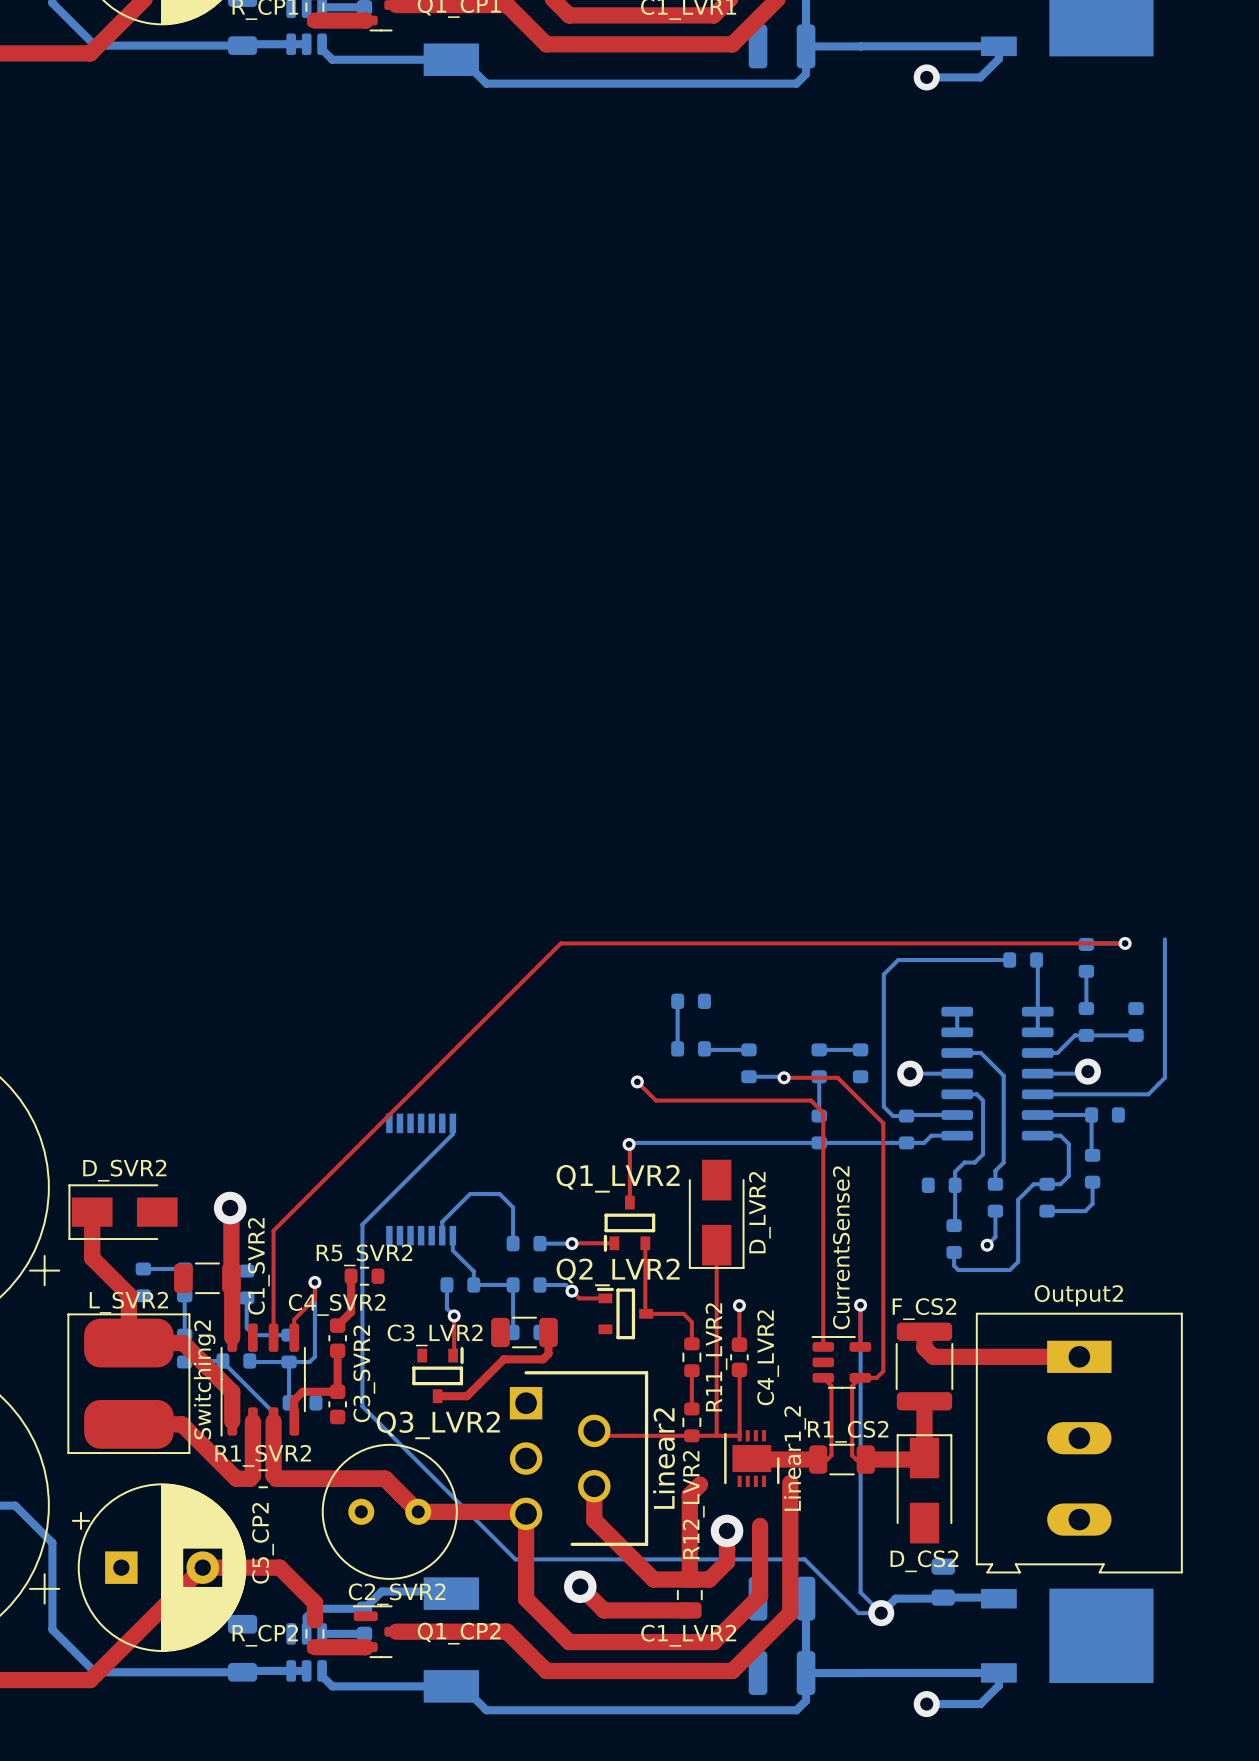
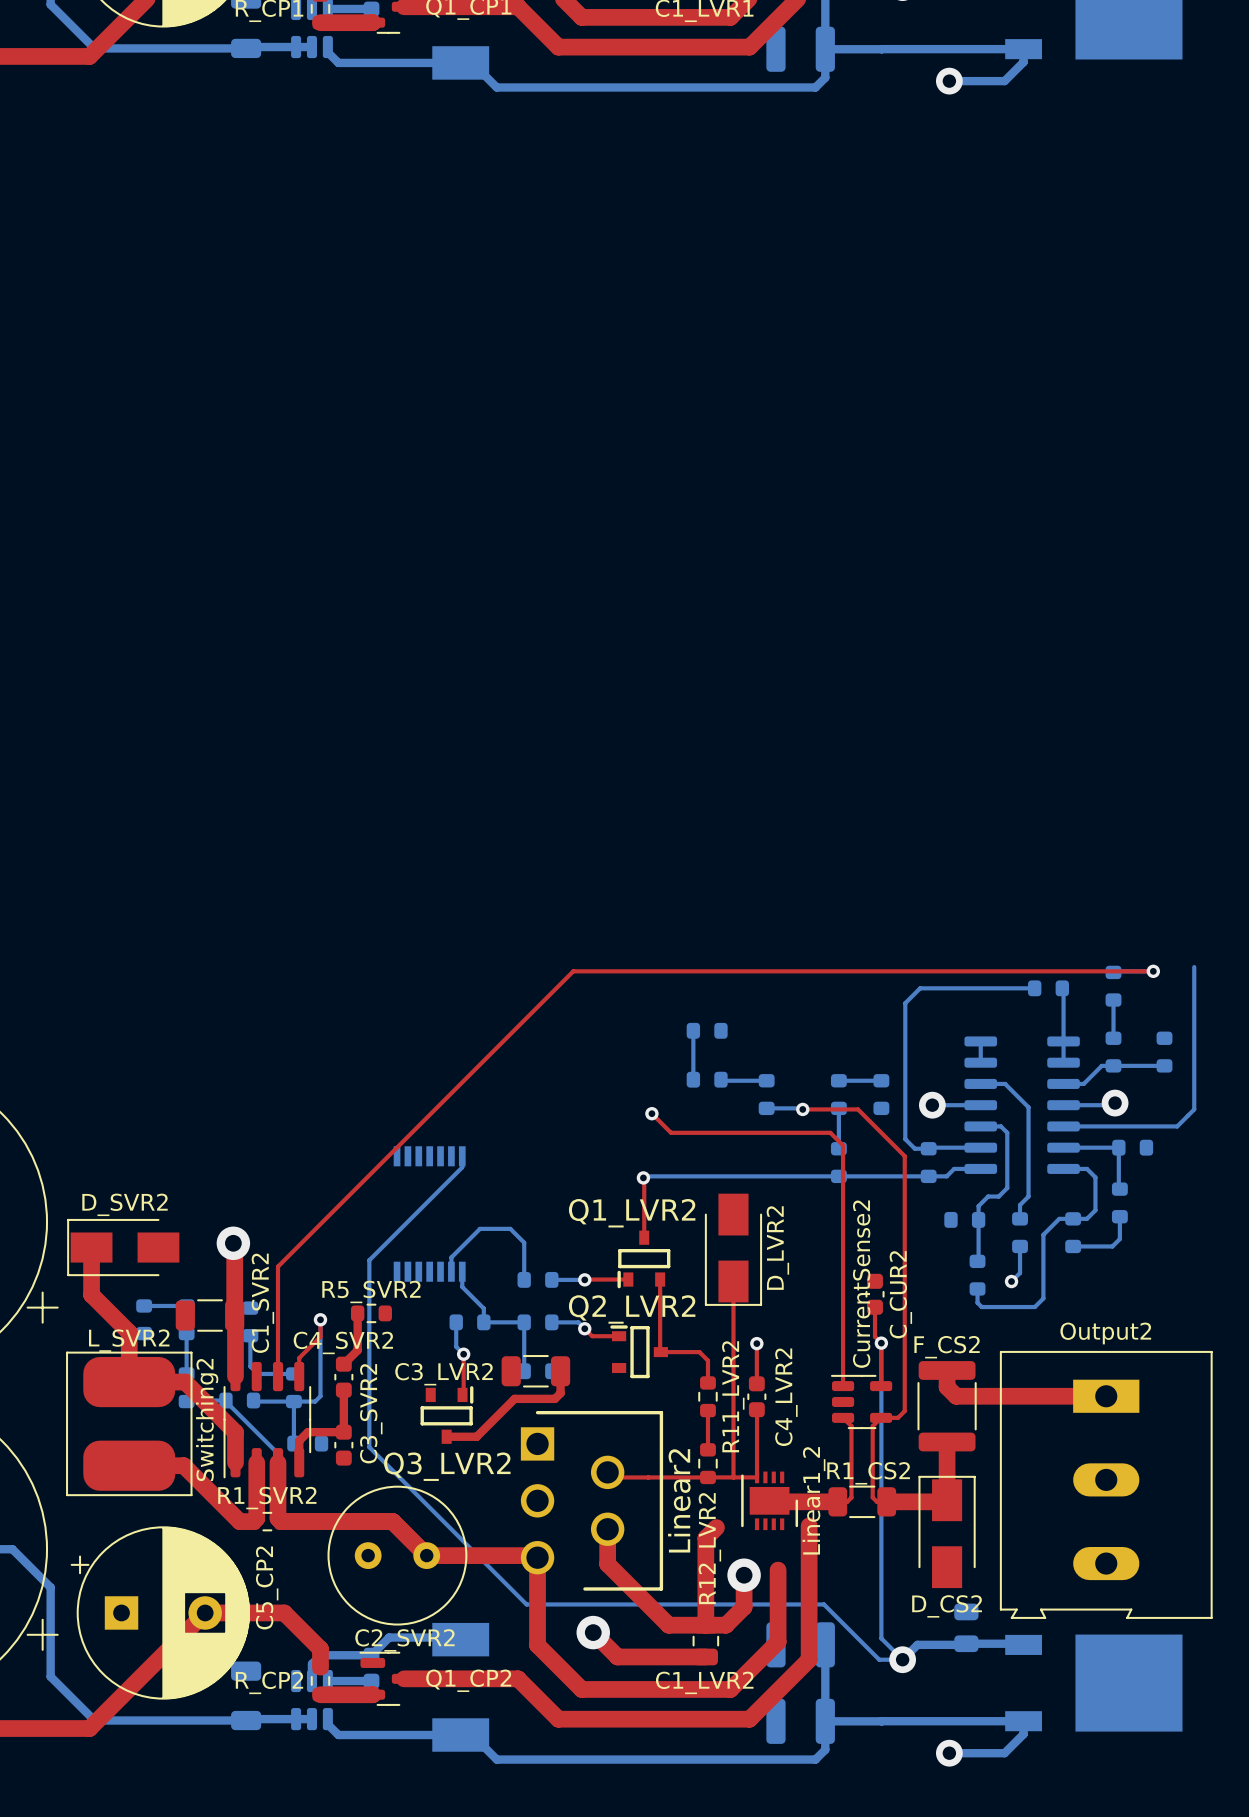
C_CUR2: none -> (875, 1294)
top track: none -> (875, 1307) (875, 1336) (881, 1343)

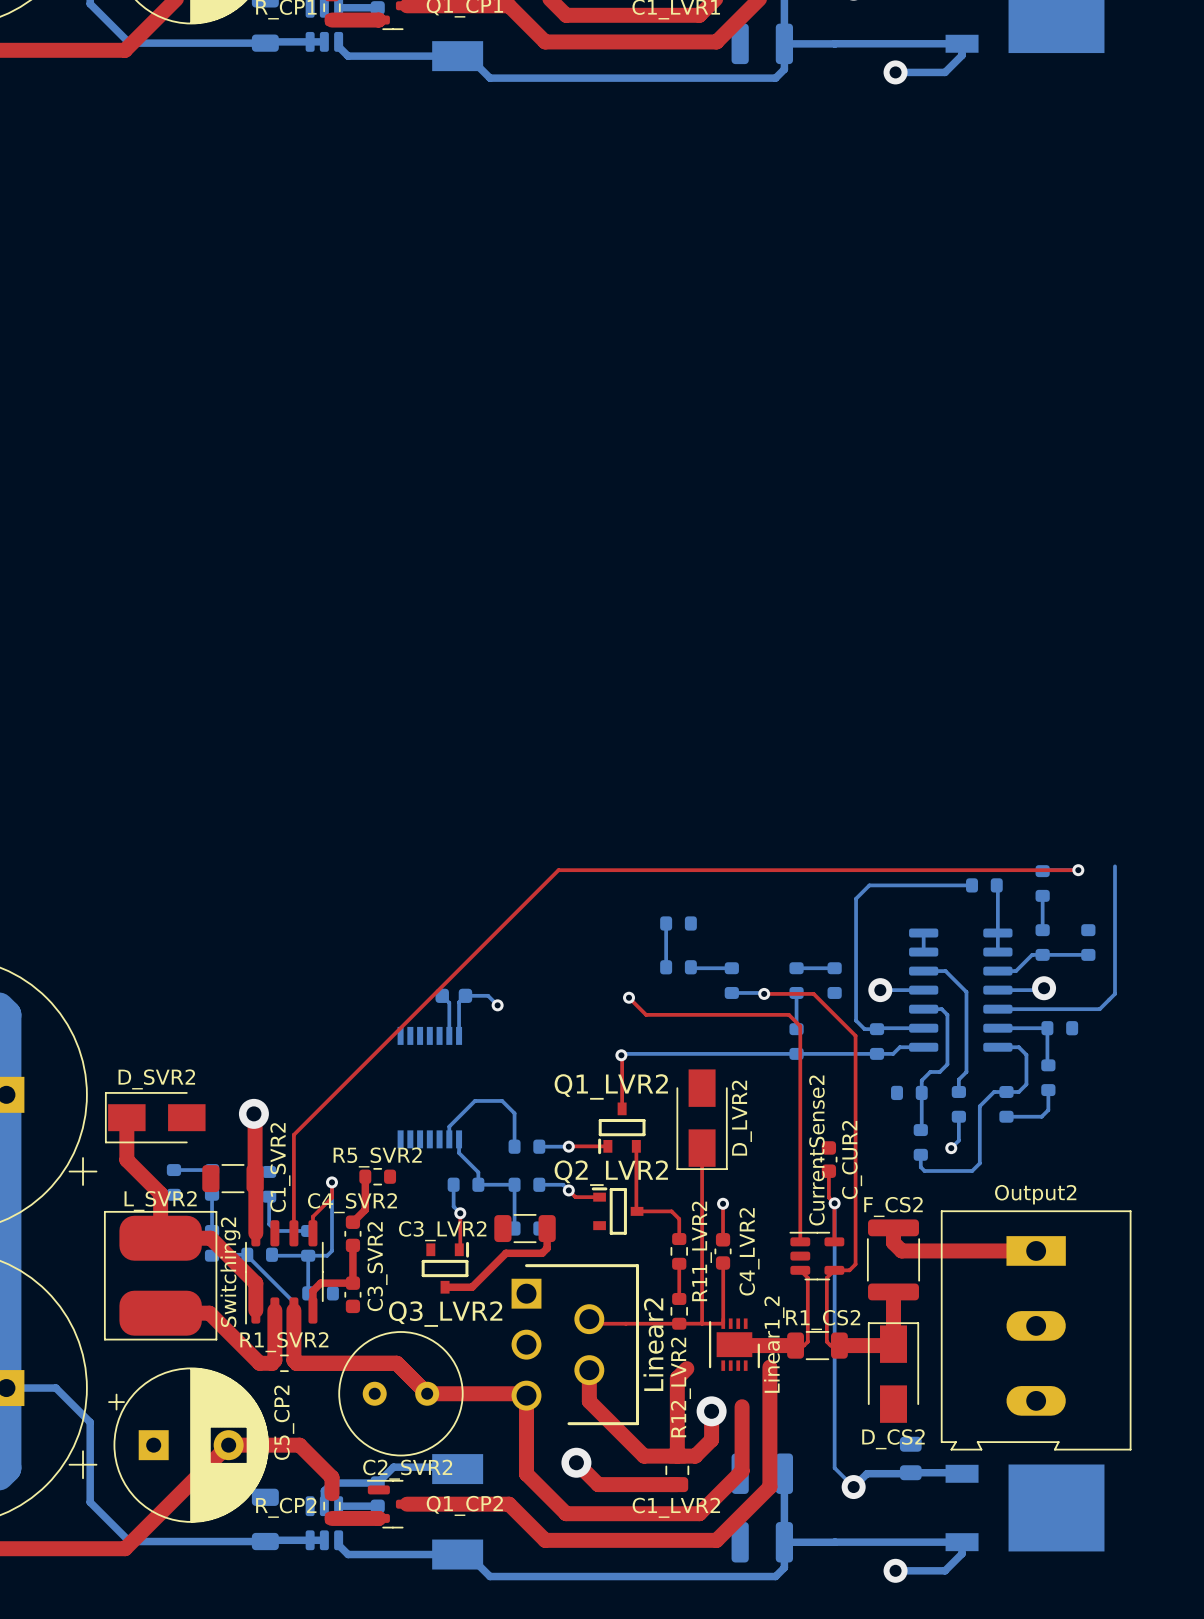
bottom track: none -> (442, 995) (449, 1002) (449, 1035)
part: none -> (453, 995)
via: none -> (497, 1005)
bottom track: (462, 1156) (462, 1167) (369, 1260) (369, 1447) (526, 1604) (824, 1604) (879, 1659) (902, 1659) -> (459, 1035) (459, 1002) (465, 995) (488, 995) (497, 1005)

